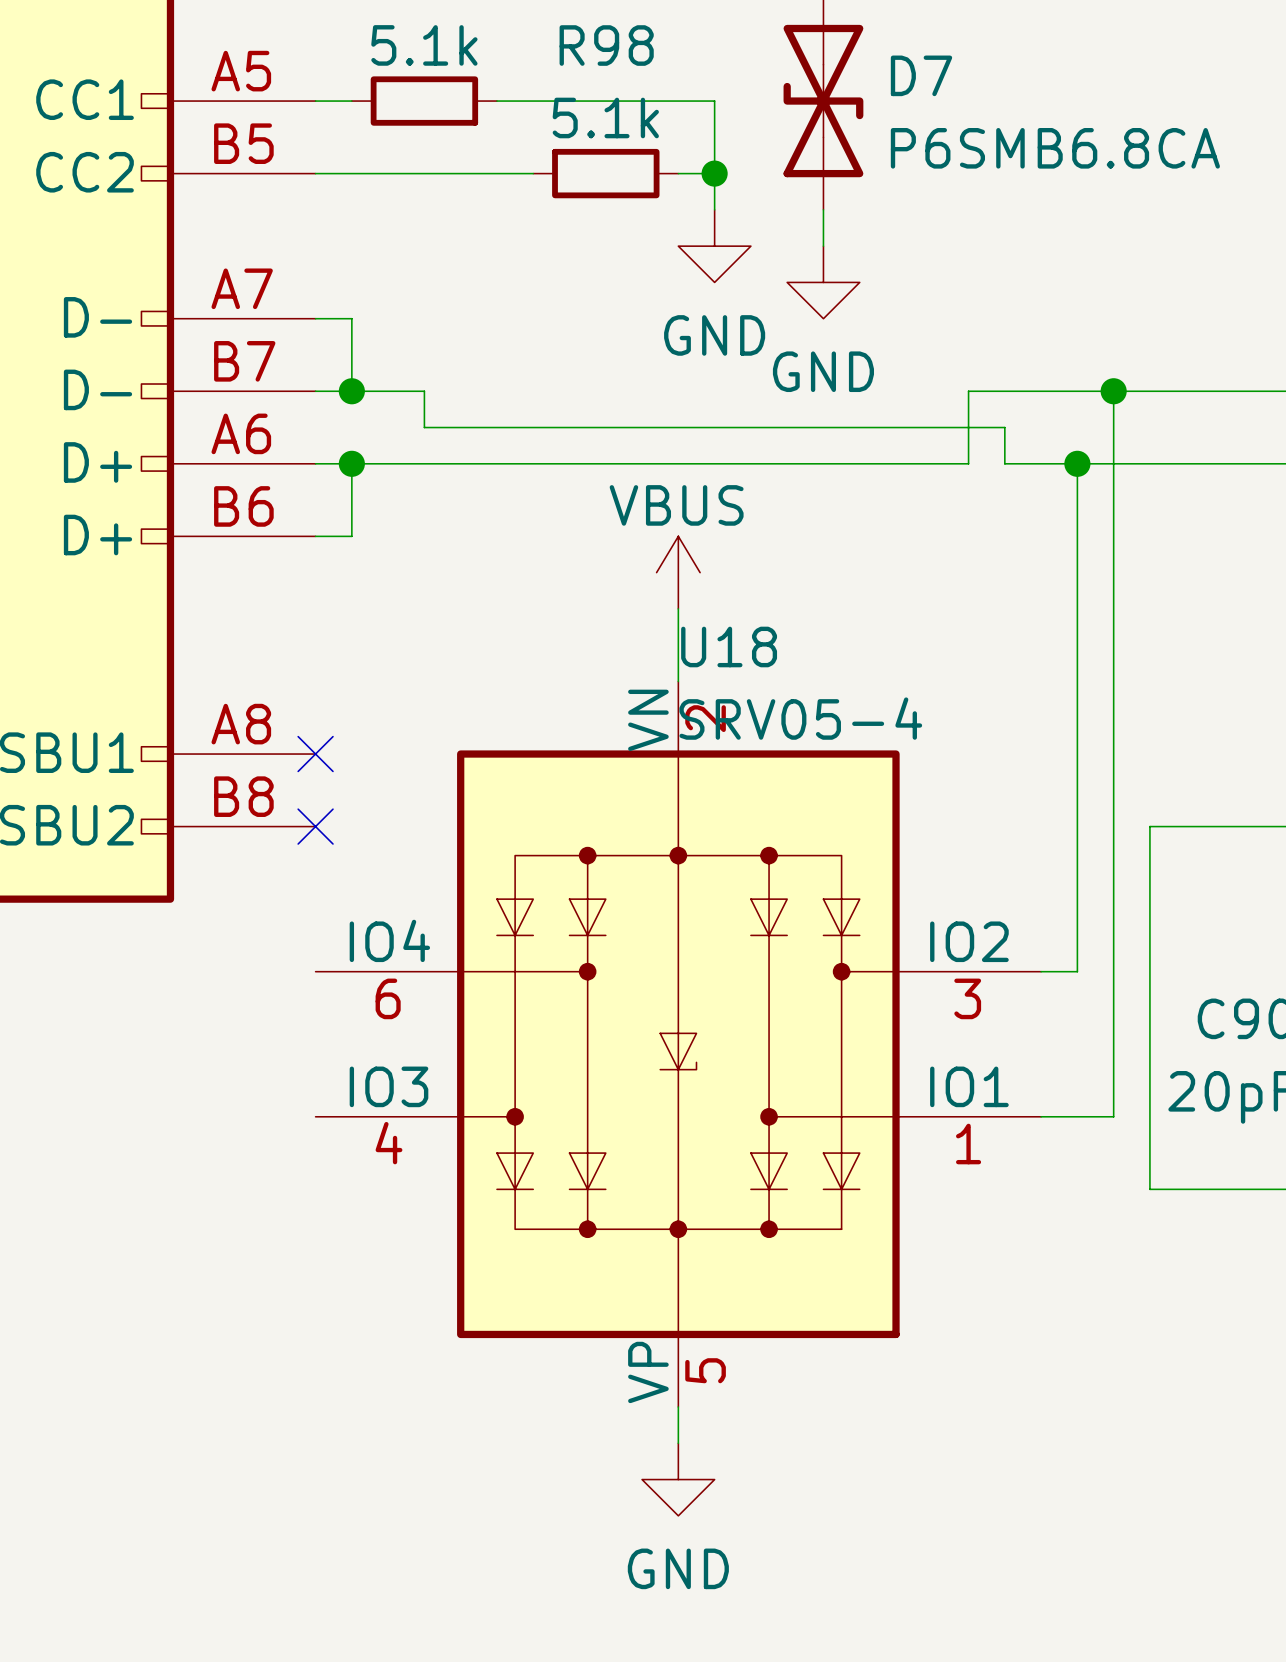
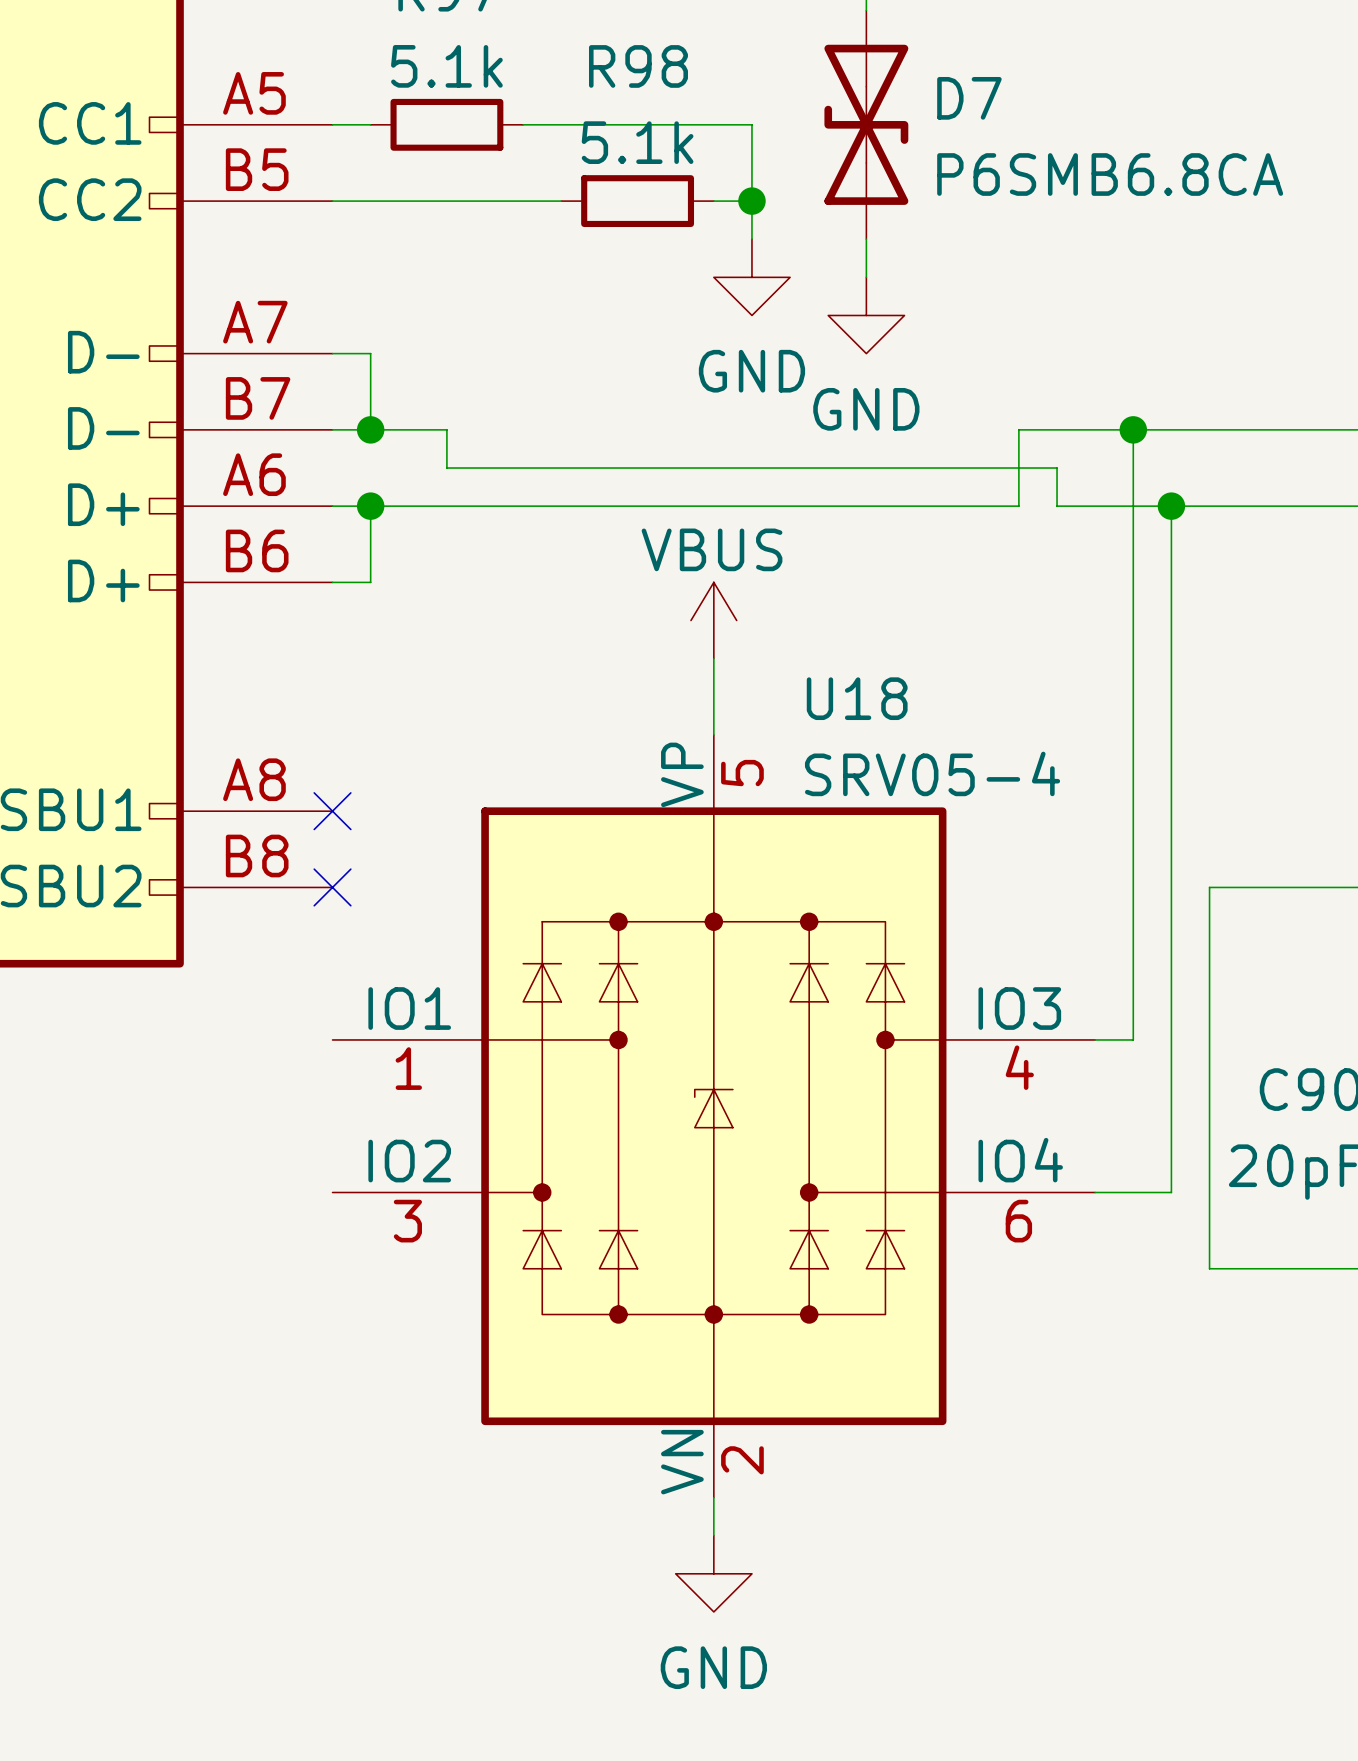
junction: none -> (1133, 429)
wire: (1113, 391) (1113, 463) -> (1133, 429) (1133, 506)
junction: (1113, 391) -> none
junction: (1077, 463) -> none
junction: none -> (1171, 506)
U18 name position: U18 (729, 646) -> U18 (857, 698)
U18 value position: SRV05-4 (800, 718) -> SRV05-4 (932, 773)
U18 rotation: 0° (678, 1044) -> 180° (713, 1116)

